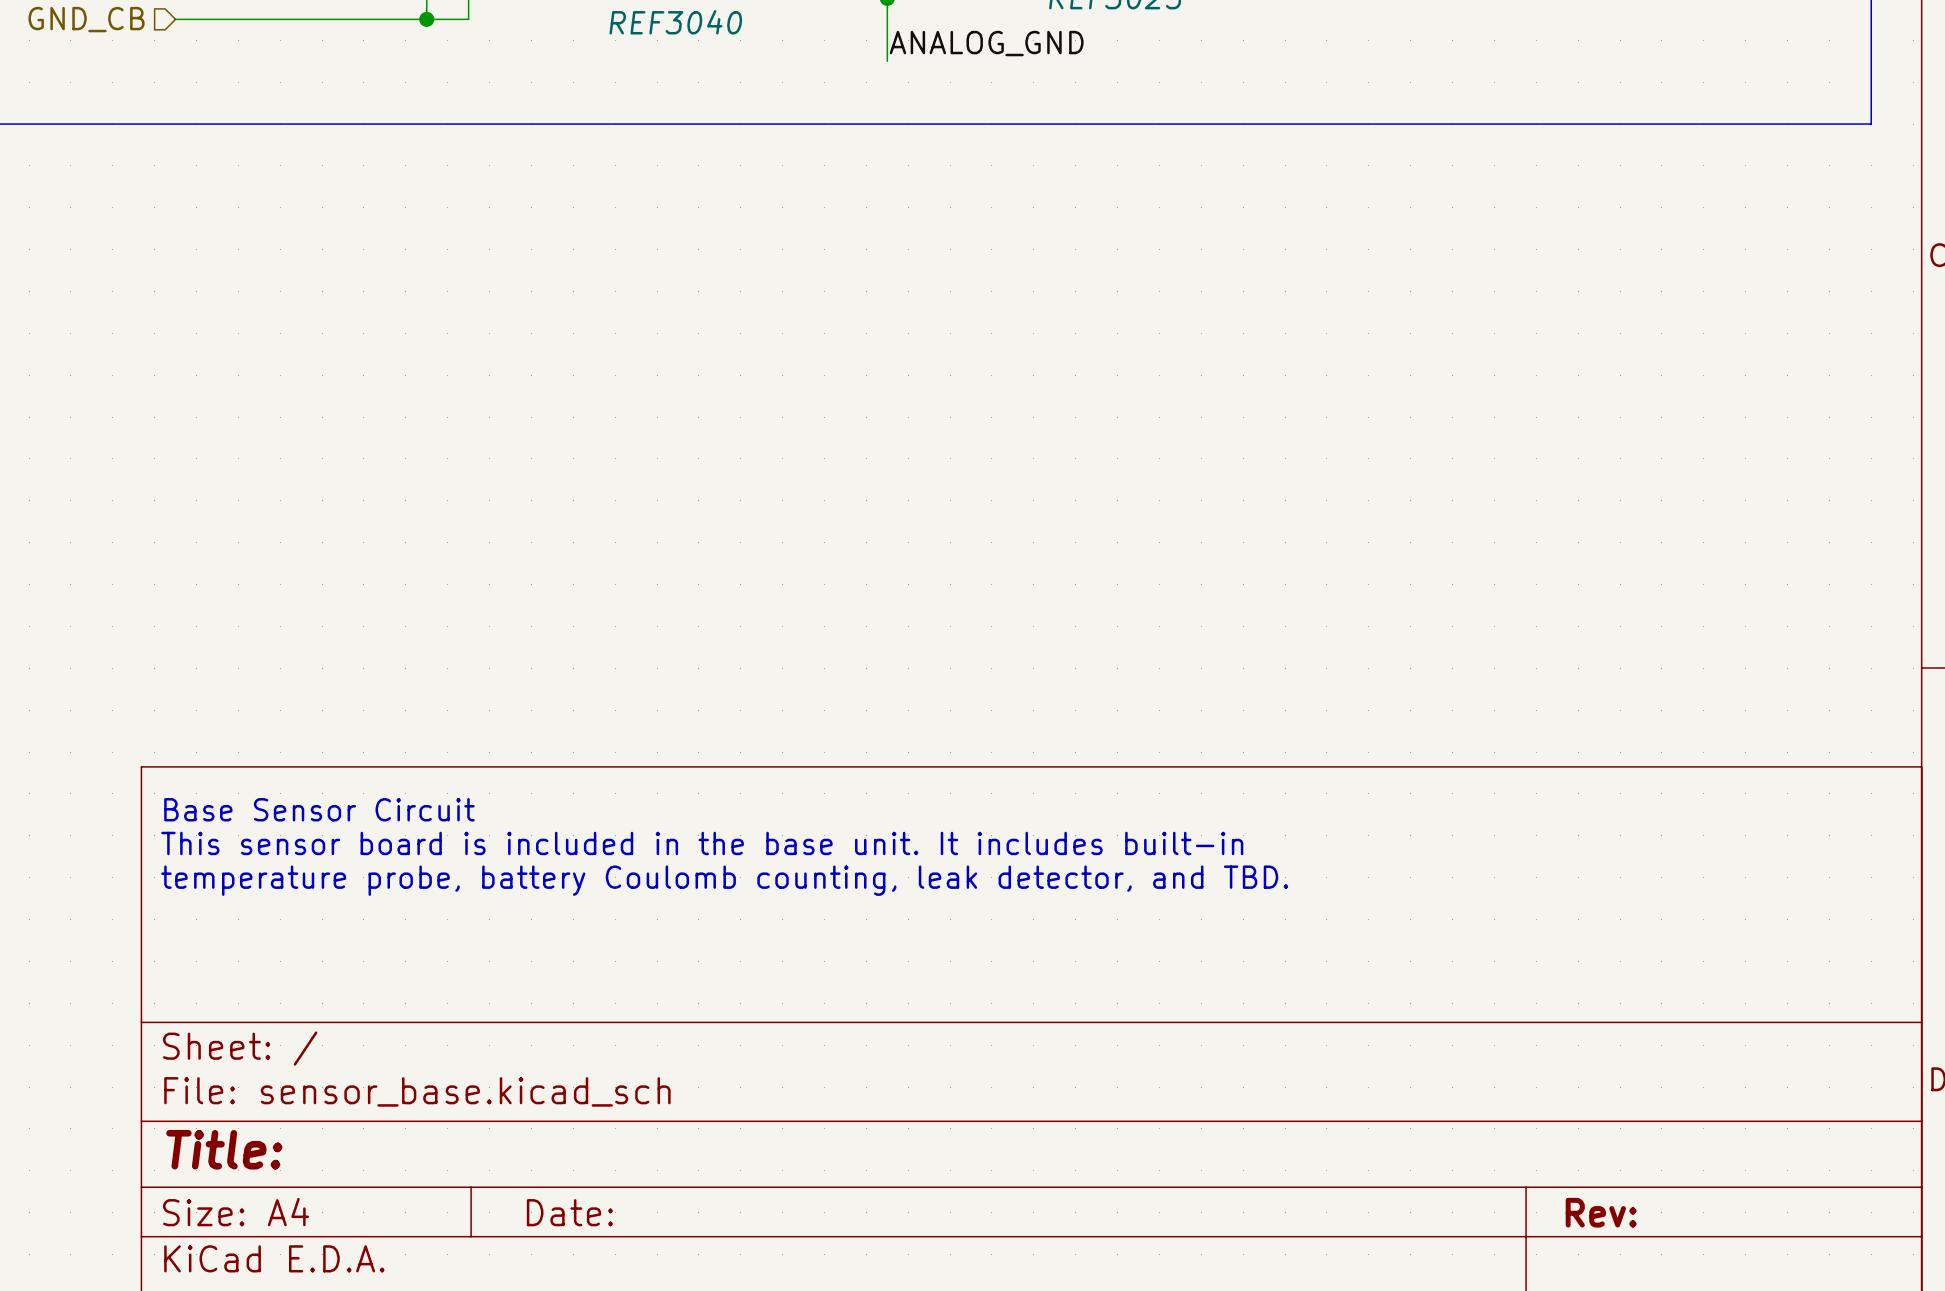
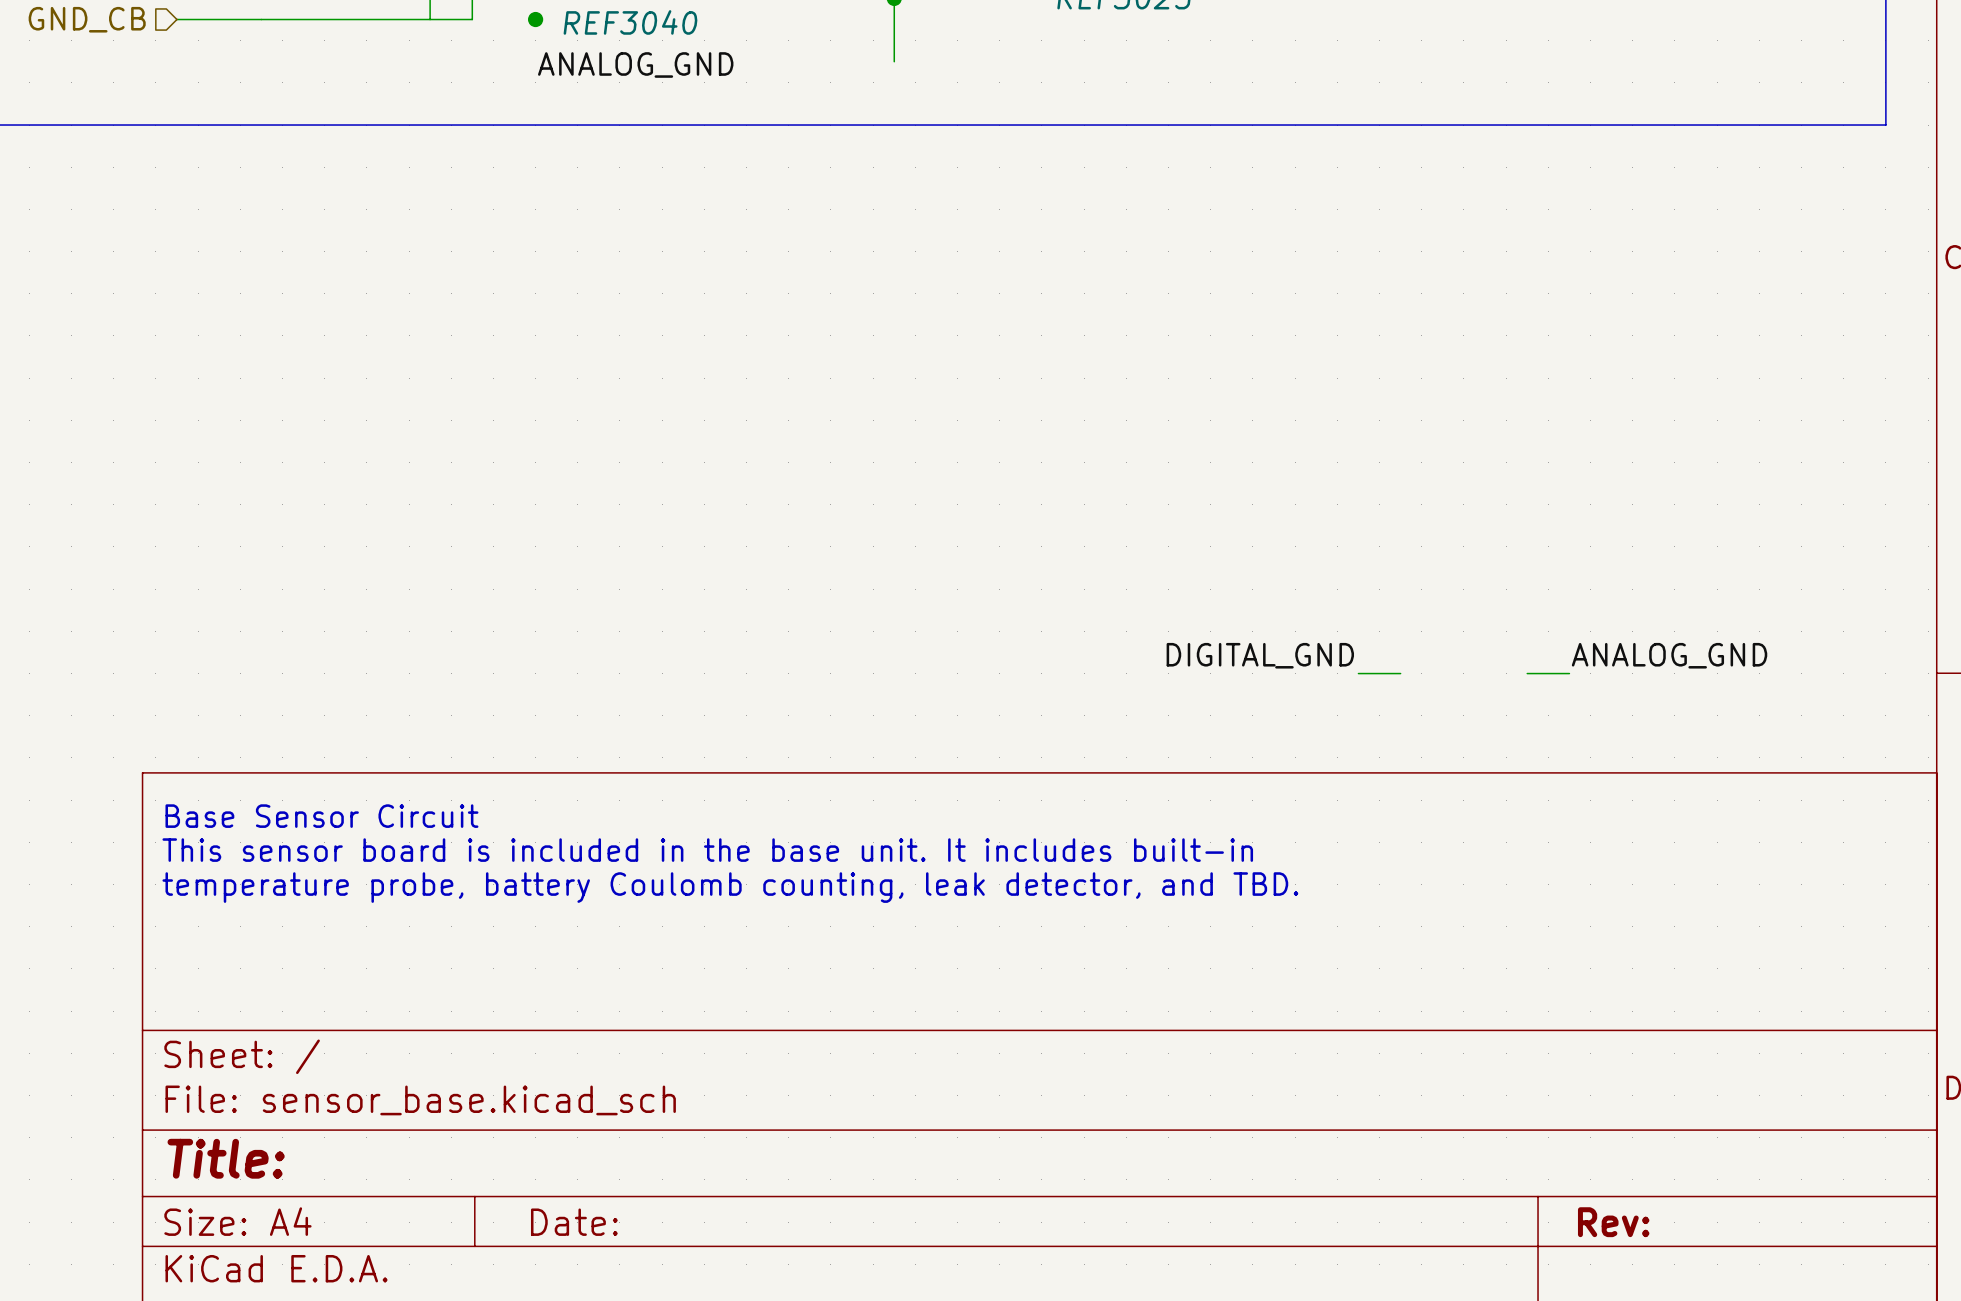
junction: (426, 19) -> none
junction: none -> (535, 19)
part value position: REF3040 (675, 22) -> REF3040 (630, 22)
label: ANALOG_GND (986, 43) -> none
label: none -> ANALOG_GND (635, 64)
label: none -> DIGITAL_GND (1260, 655)
label: none -> ANALOG_GND (1669, 655)
wire: none -> (1358, 673) (1400, 673)
wire: none -> (1527, 673) (1569, 673)

